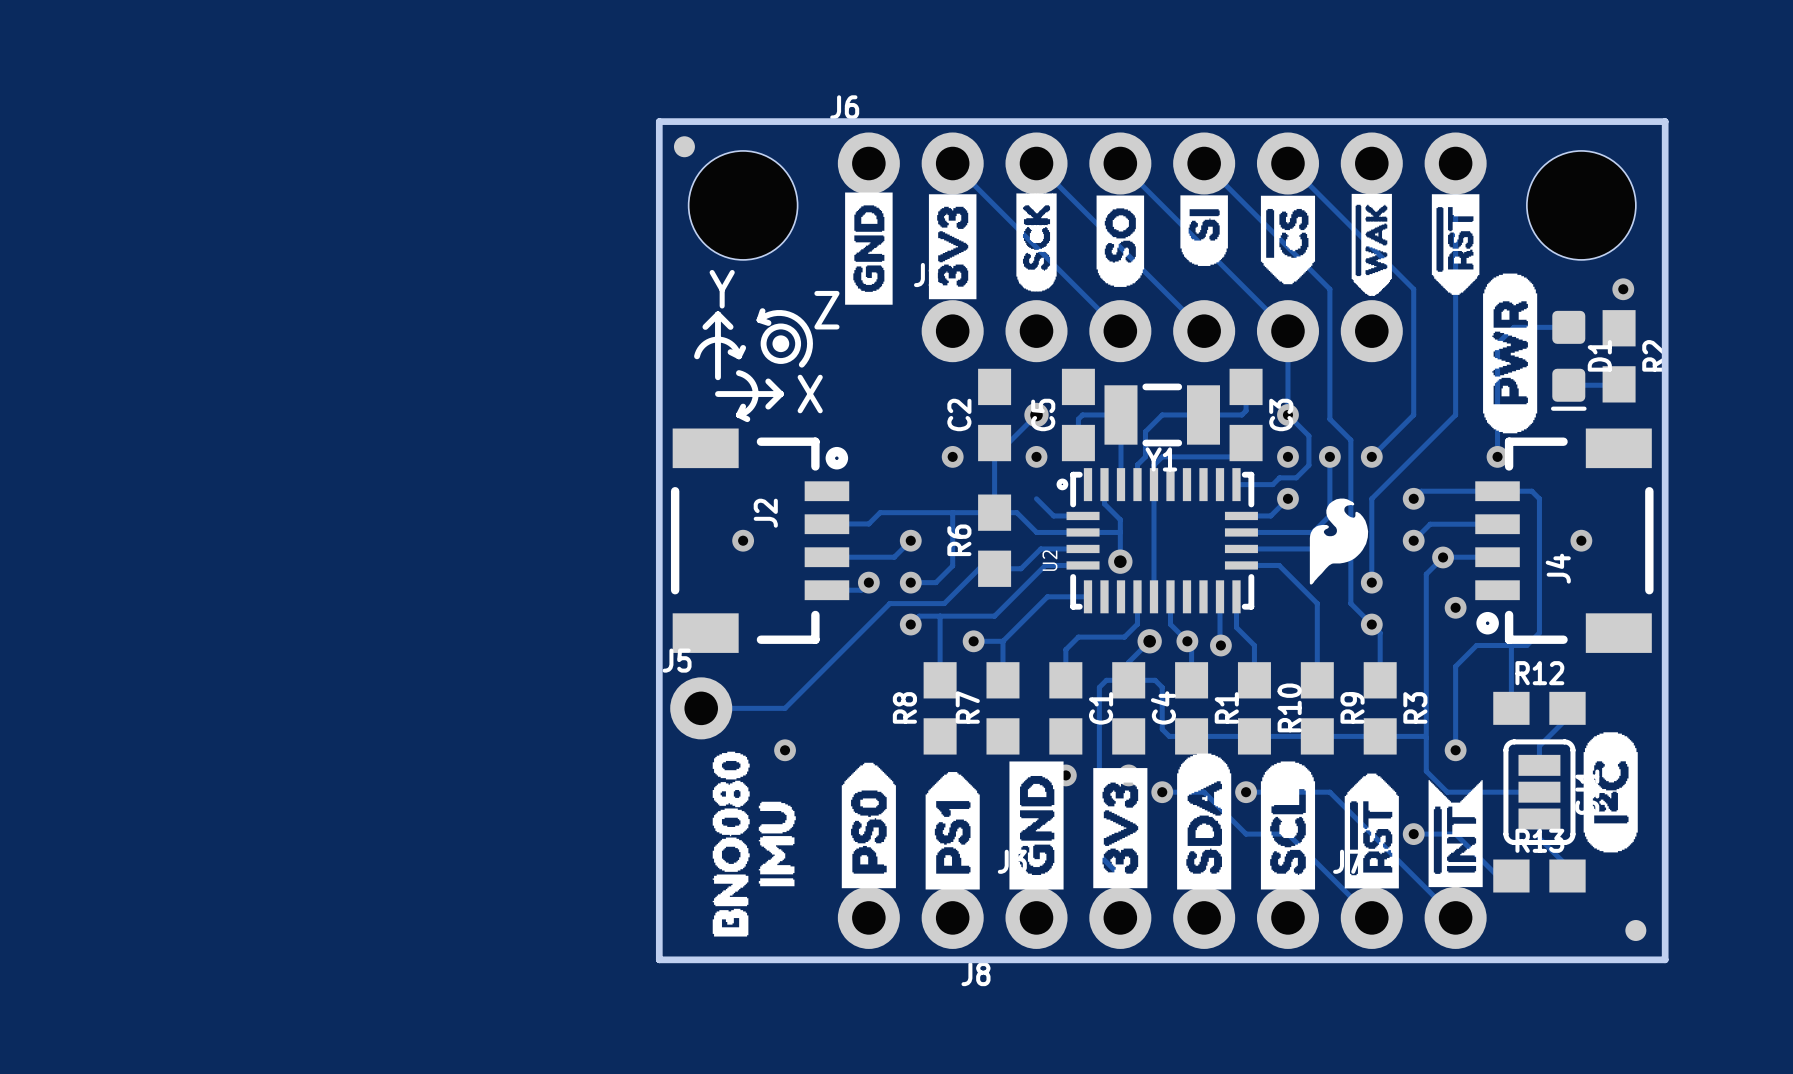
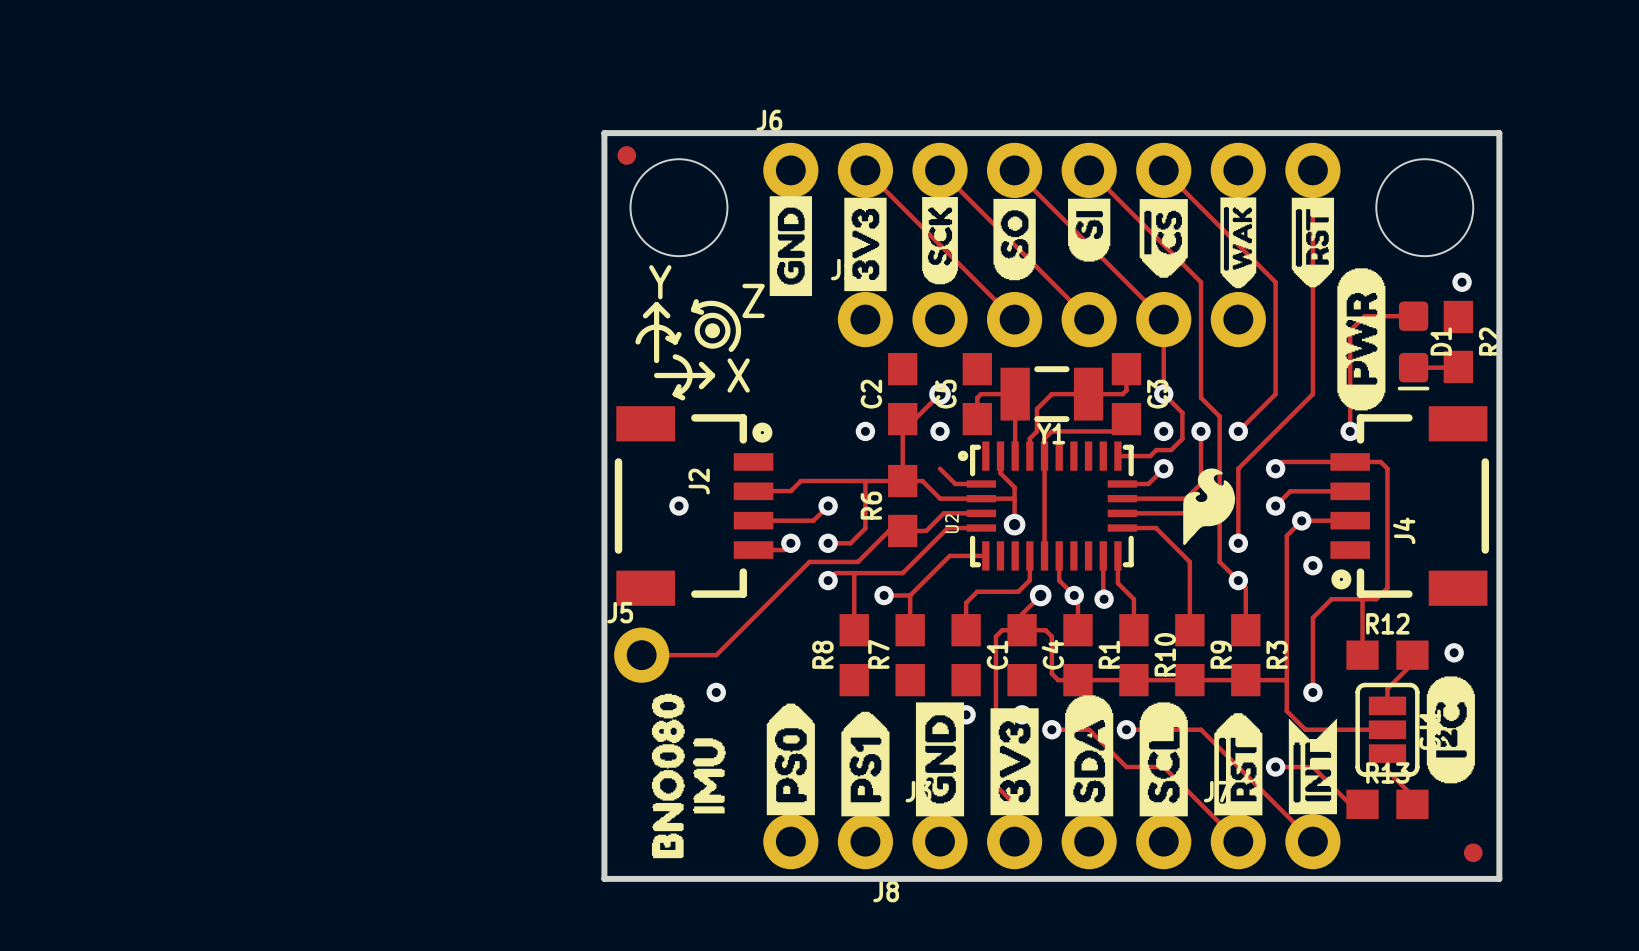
via position: (1581, 540) -> (1454, 652)

